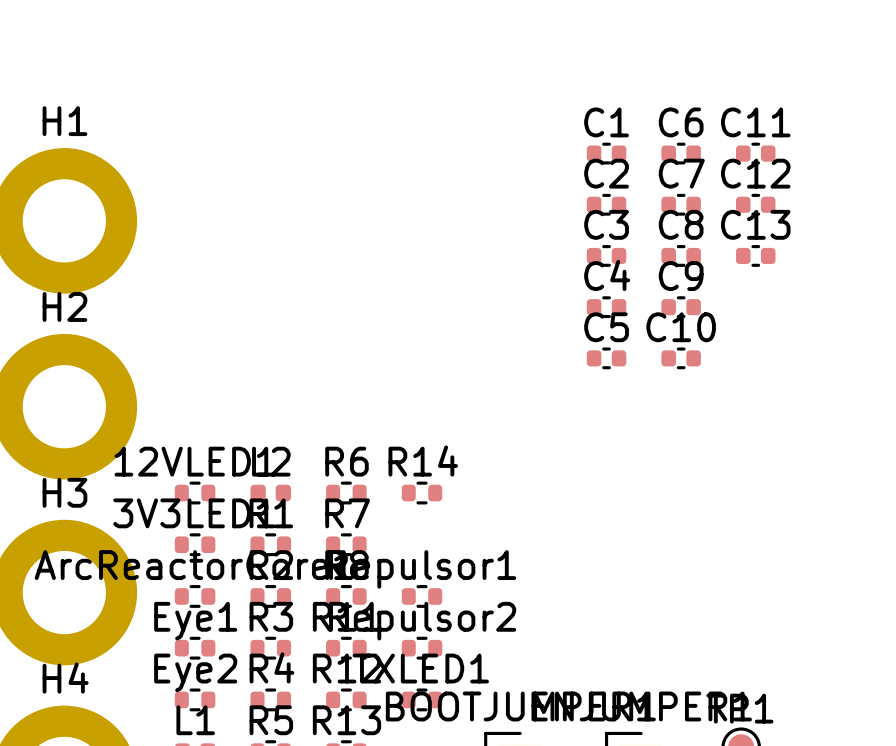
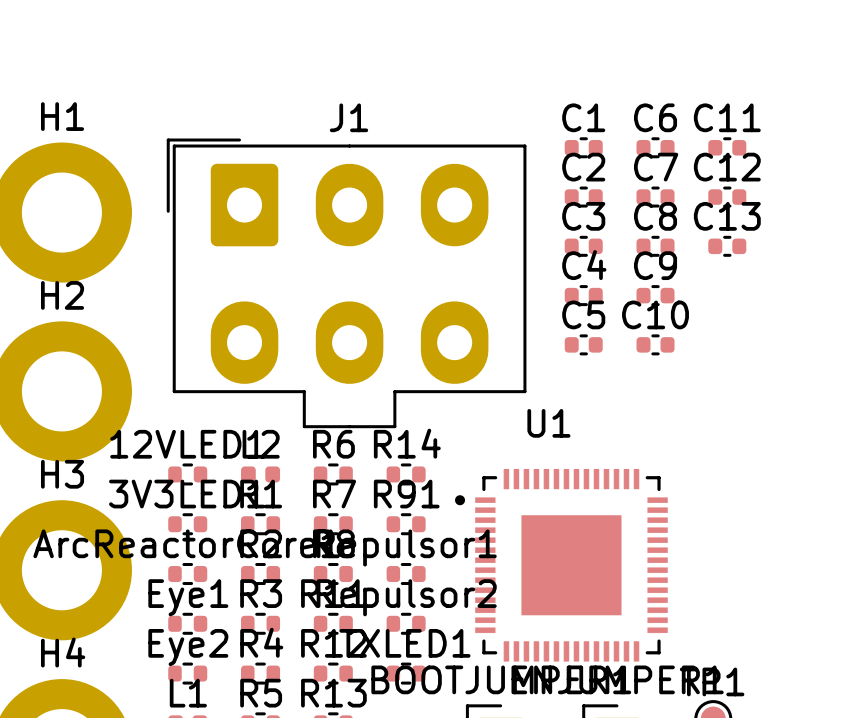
J1: none -> (346, 283)
R91: none -> (406, 524)
U1: none -> (561, 565)

